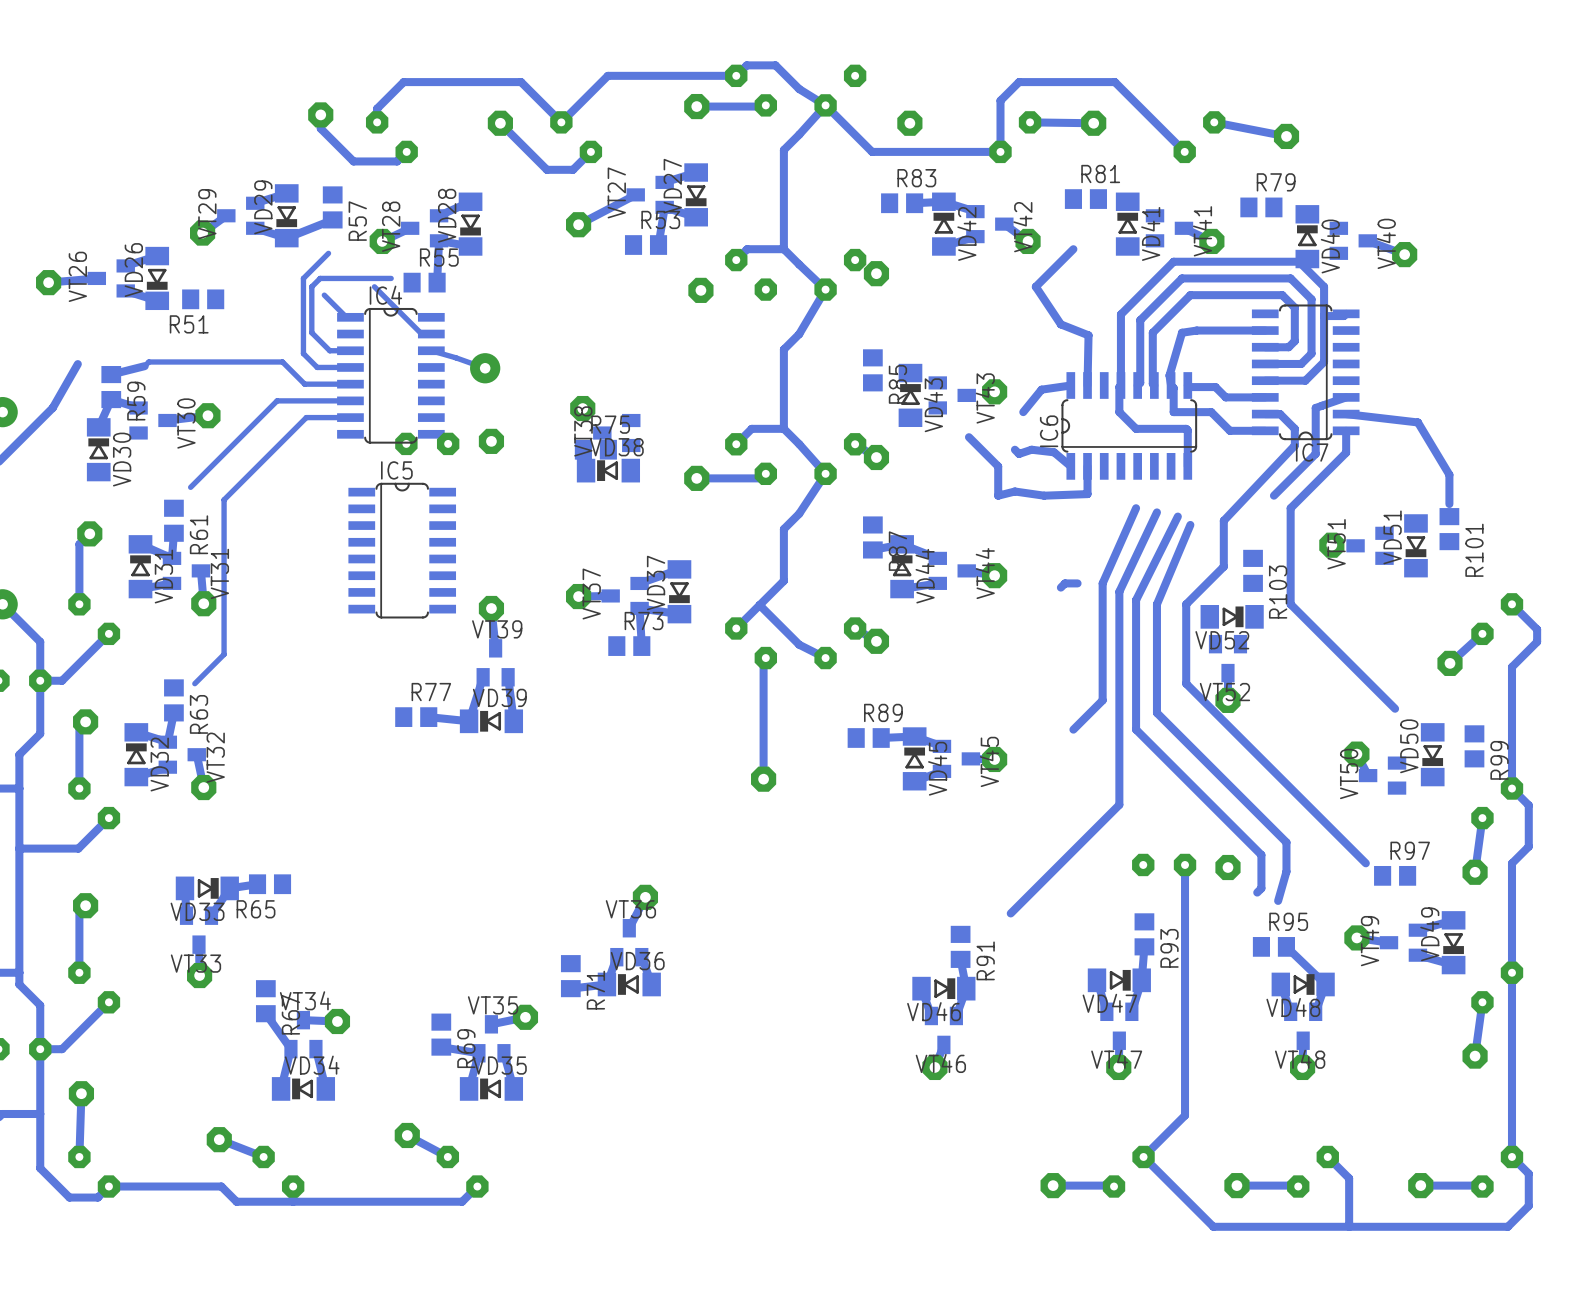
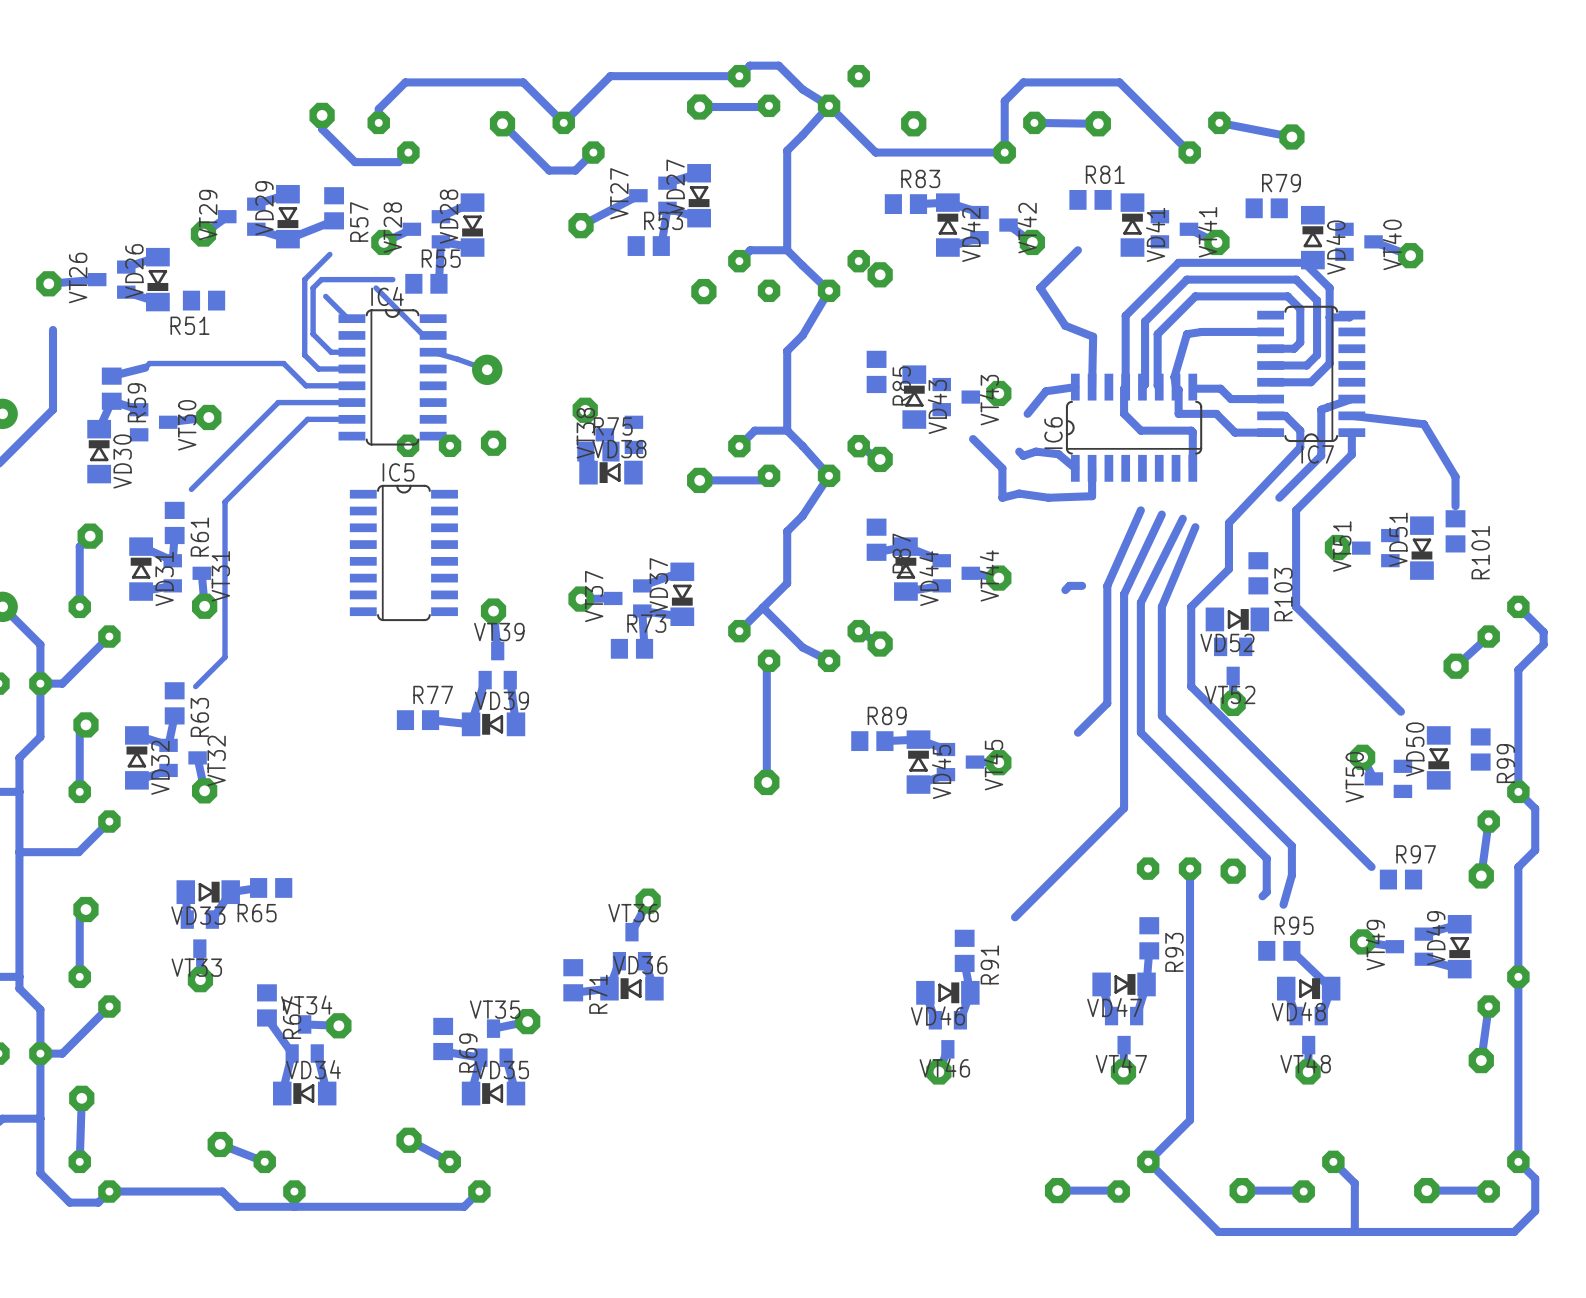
track: (77, 364) (52, 407) -> (53, 329) (53, 409)

